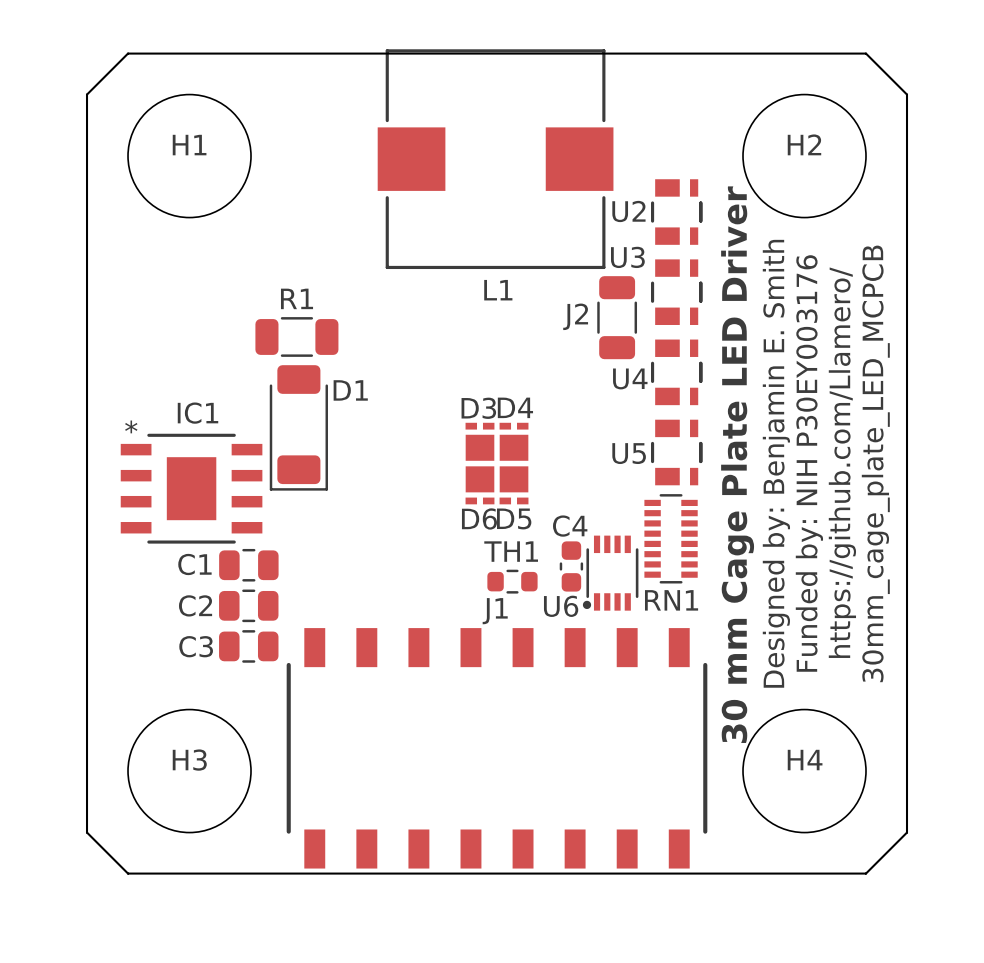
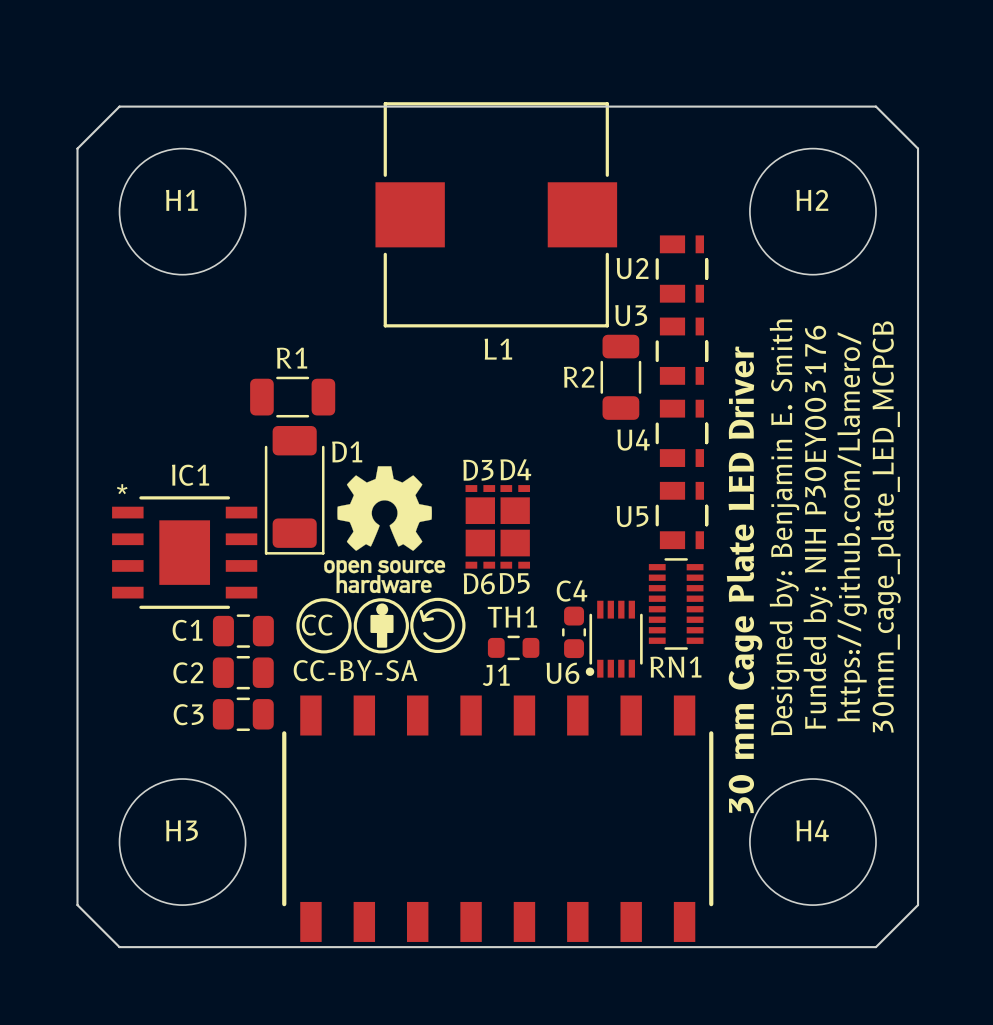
J2 name: J2 (575, 316) -> R2 (579, 377)
drawing: none -> [296, 466, 466, 654]

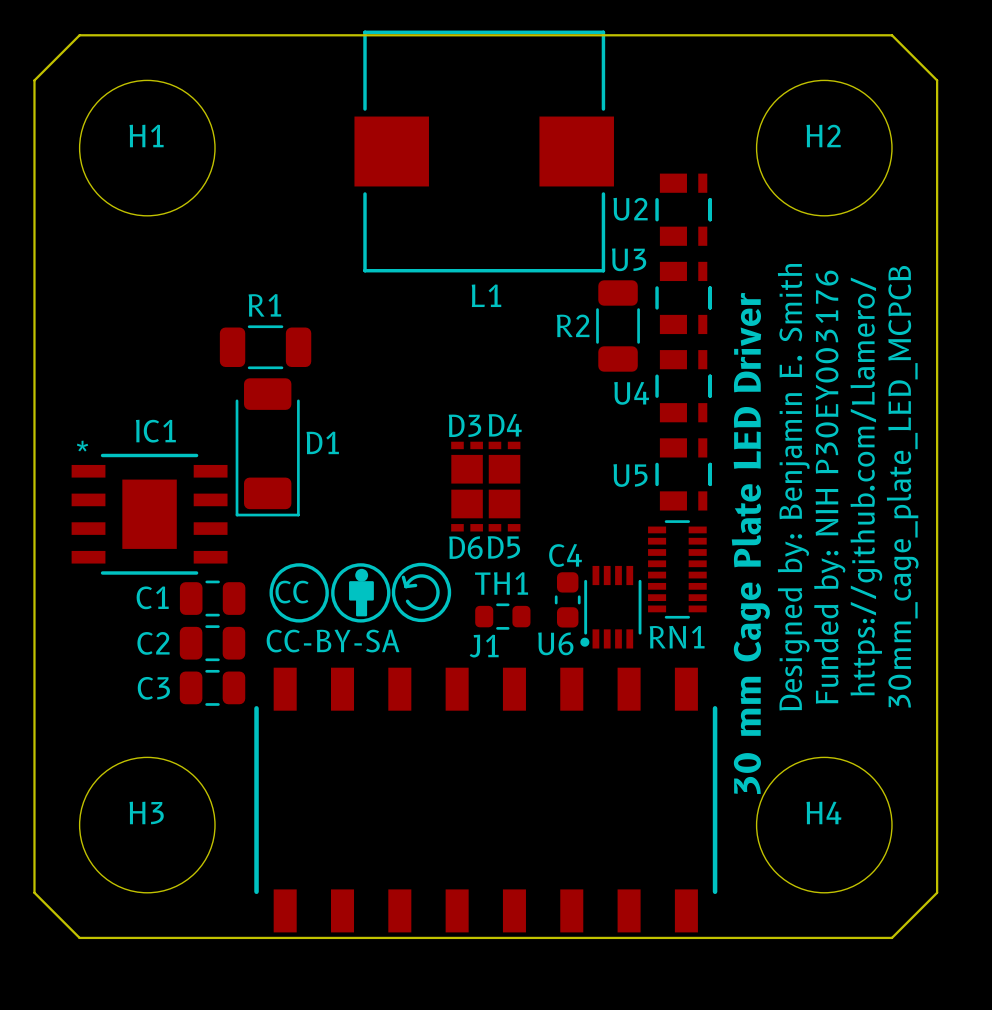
D1 name position: D1 (347, 451) -> D1 (322, 442)
drawing: [324, 466, 446, 594] -> none

